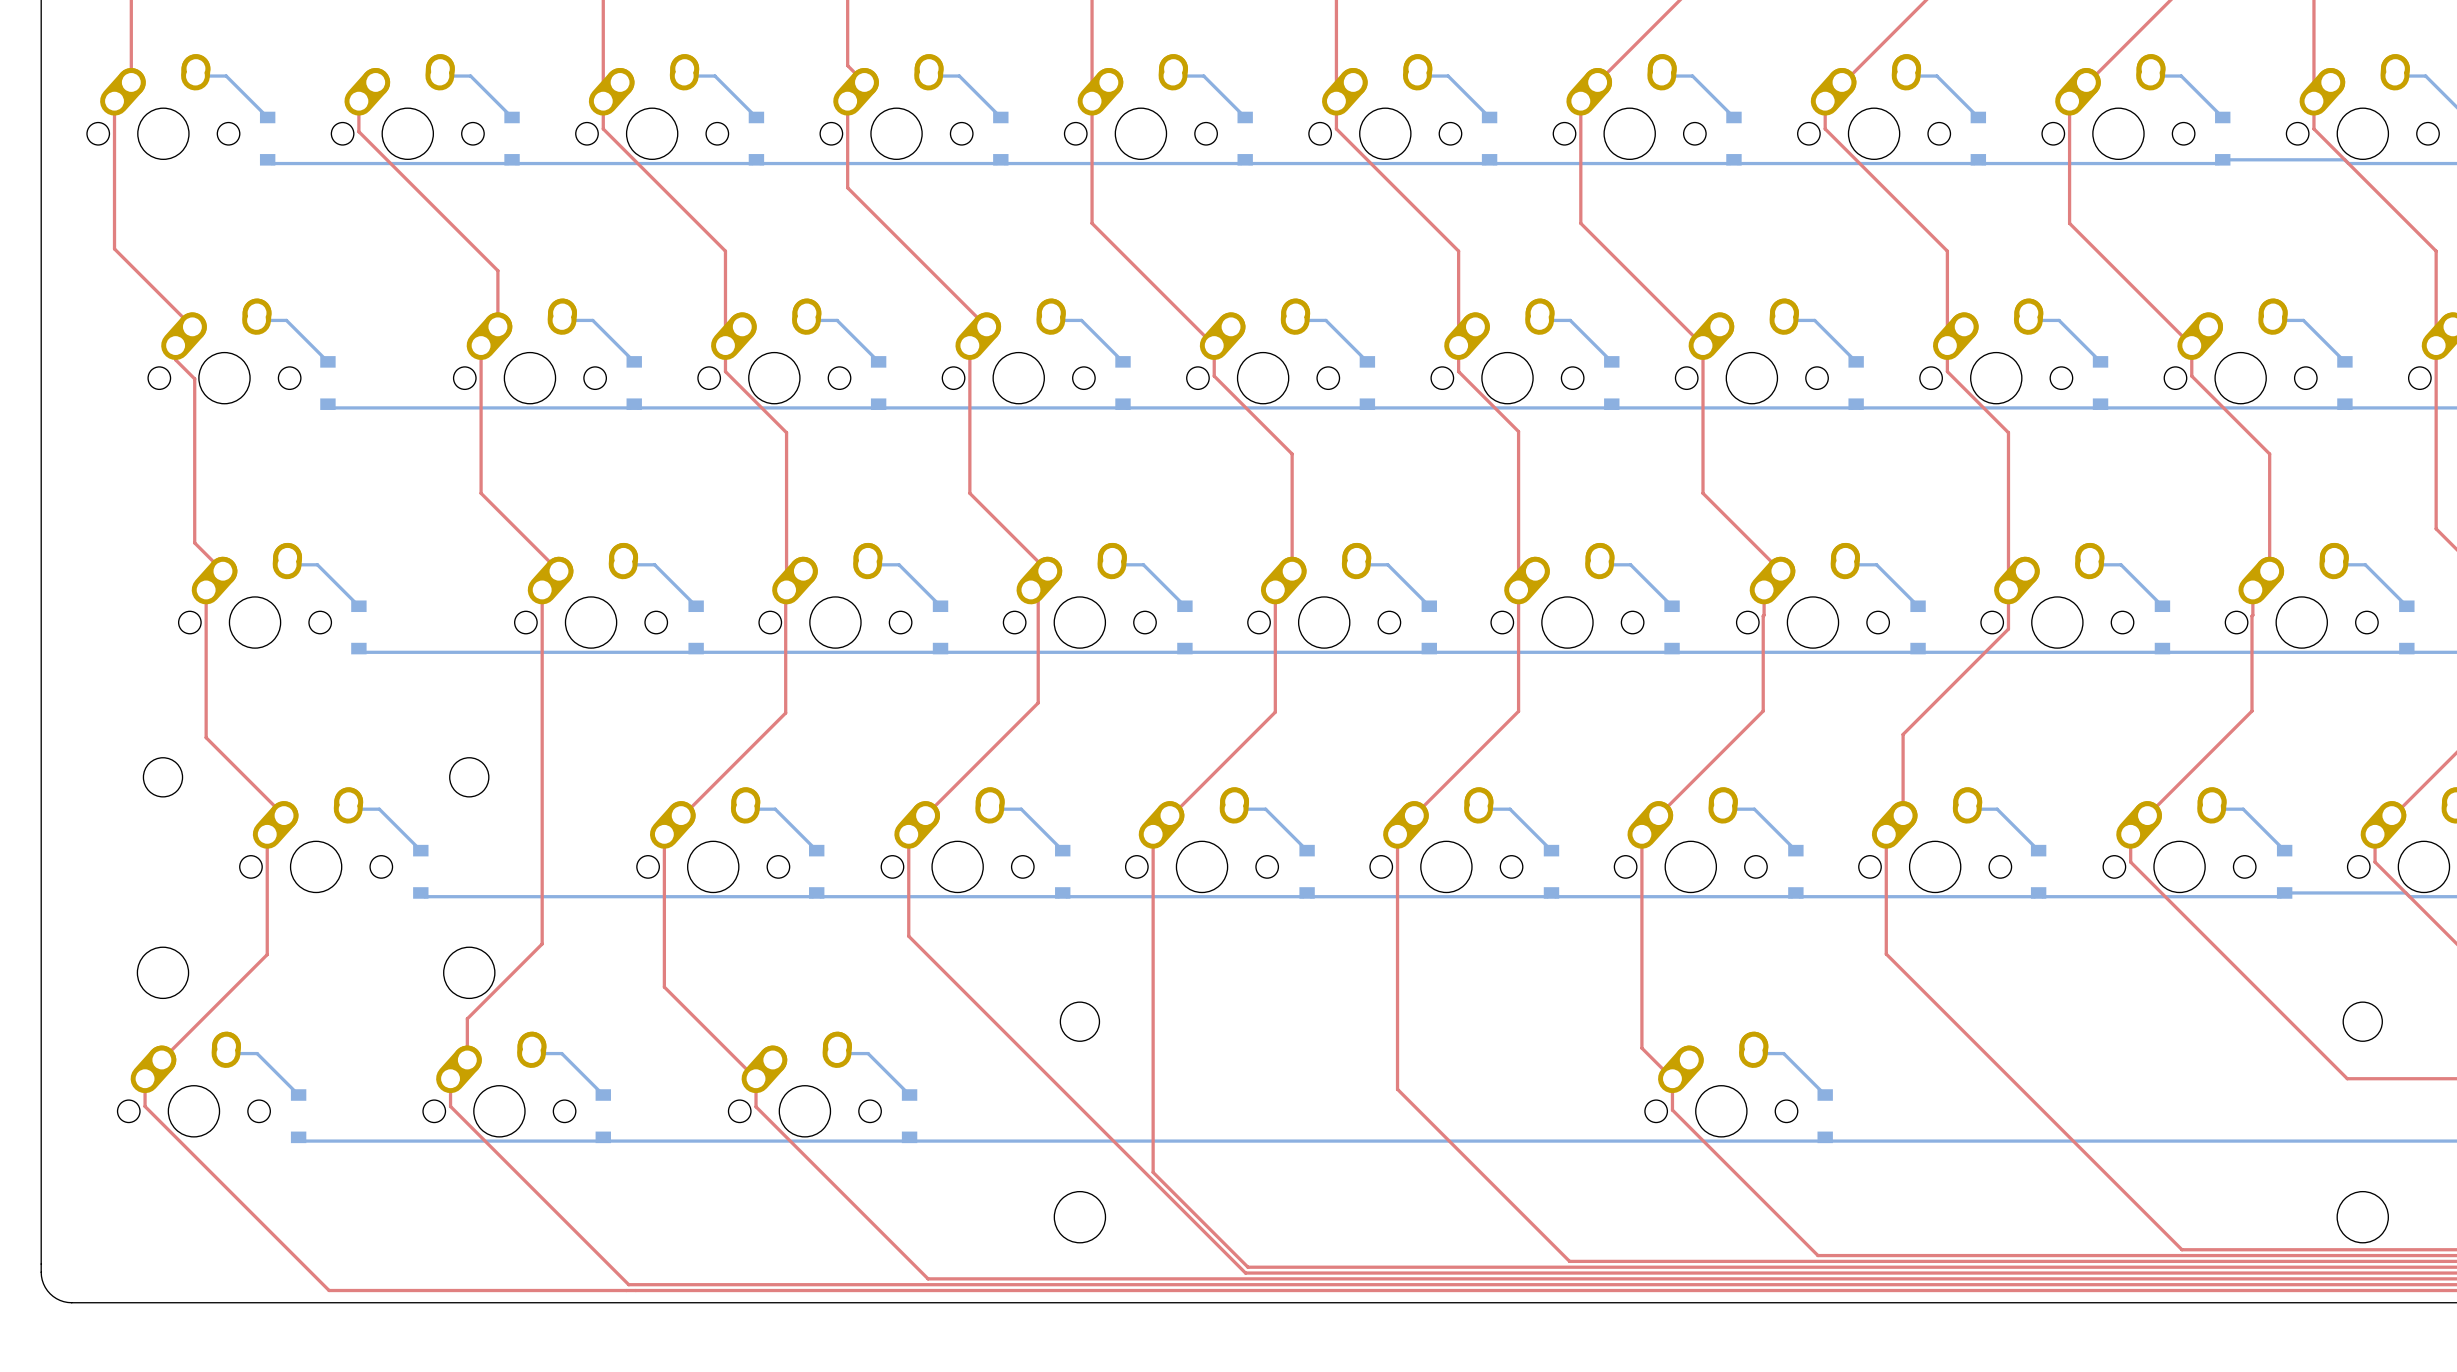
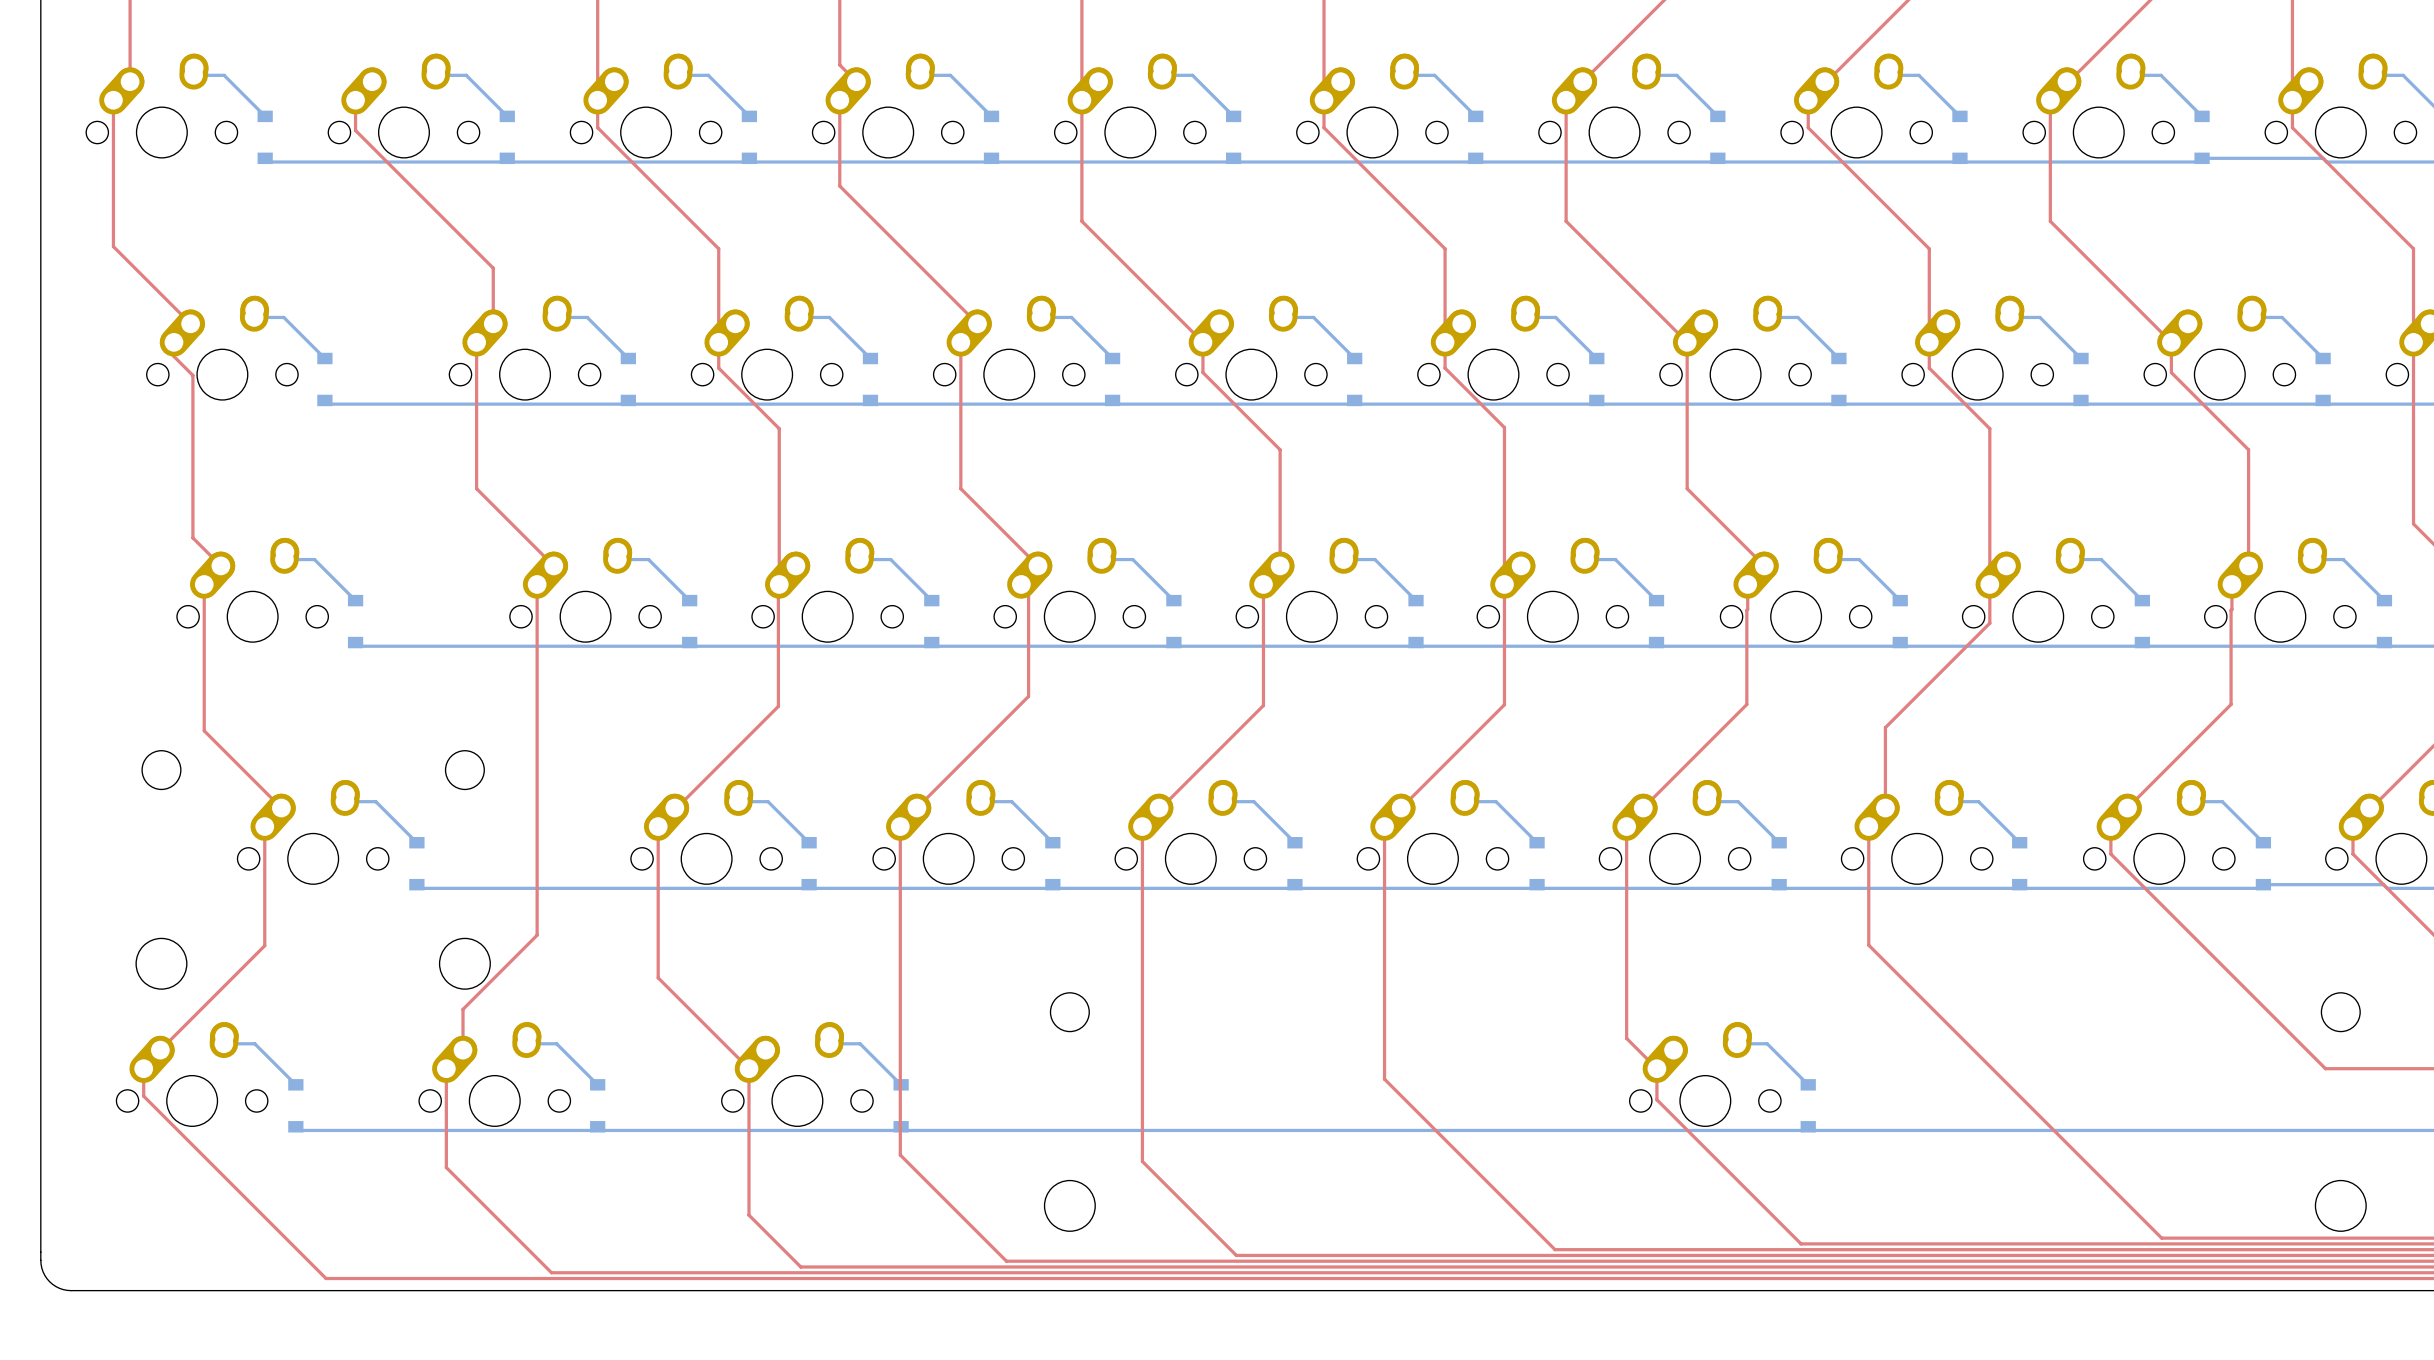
top track: (908, 936) (1245, 1273) -> (900, 927) (900, 1155) (1006, 1261) (1233, 1261)
top track: (450, 1106) (628, 1284) -> (446, 1096) (446, 1167) (551, 1272) (622, 1272)
top track: (756, 1106) (928, 1278) -> (748, 1096) (748, 1215) (800, 1266) (919, 1266)

